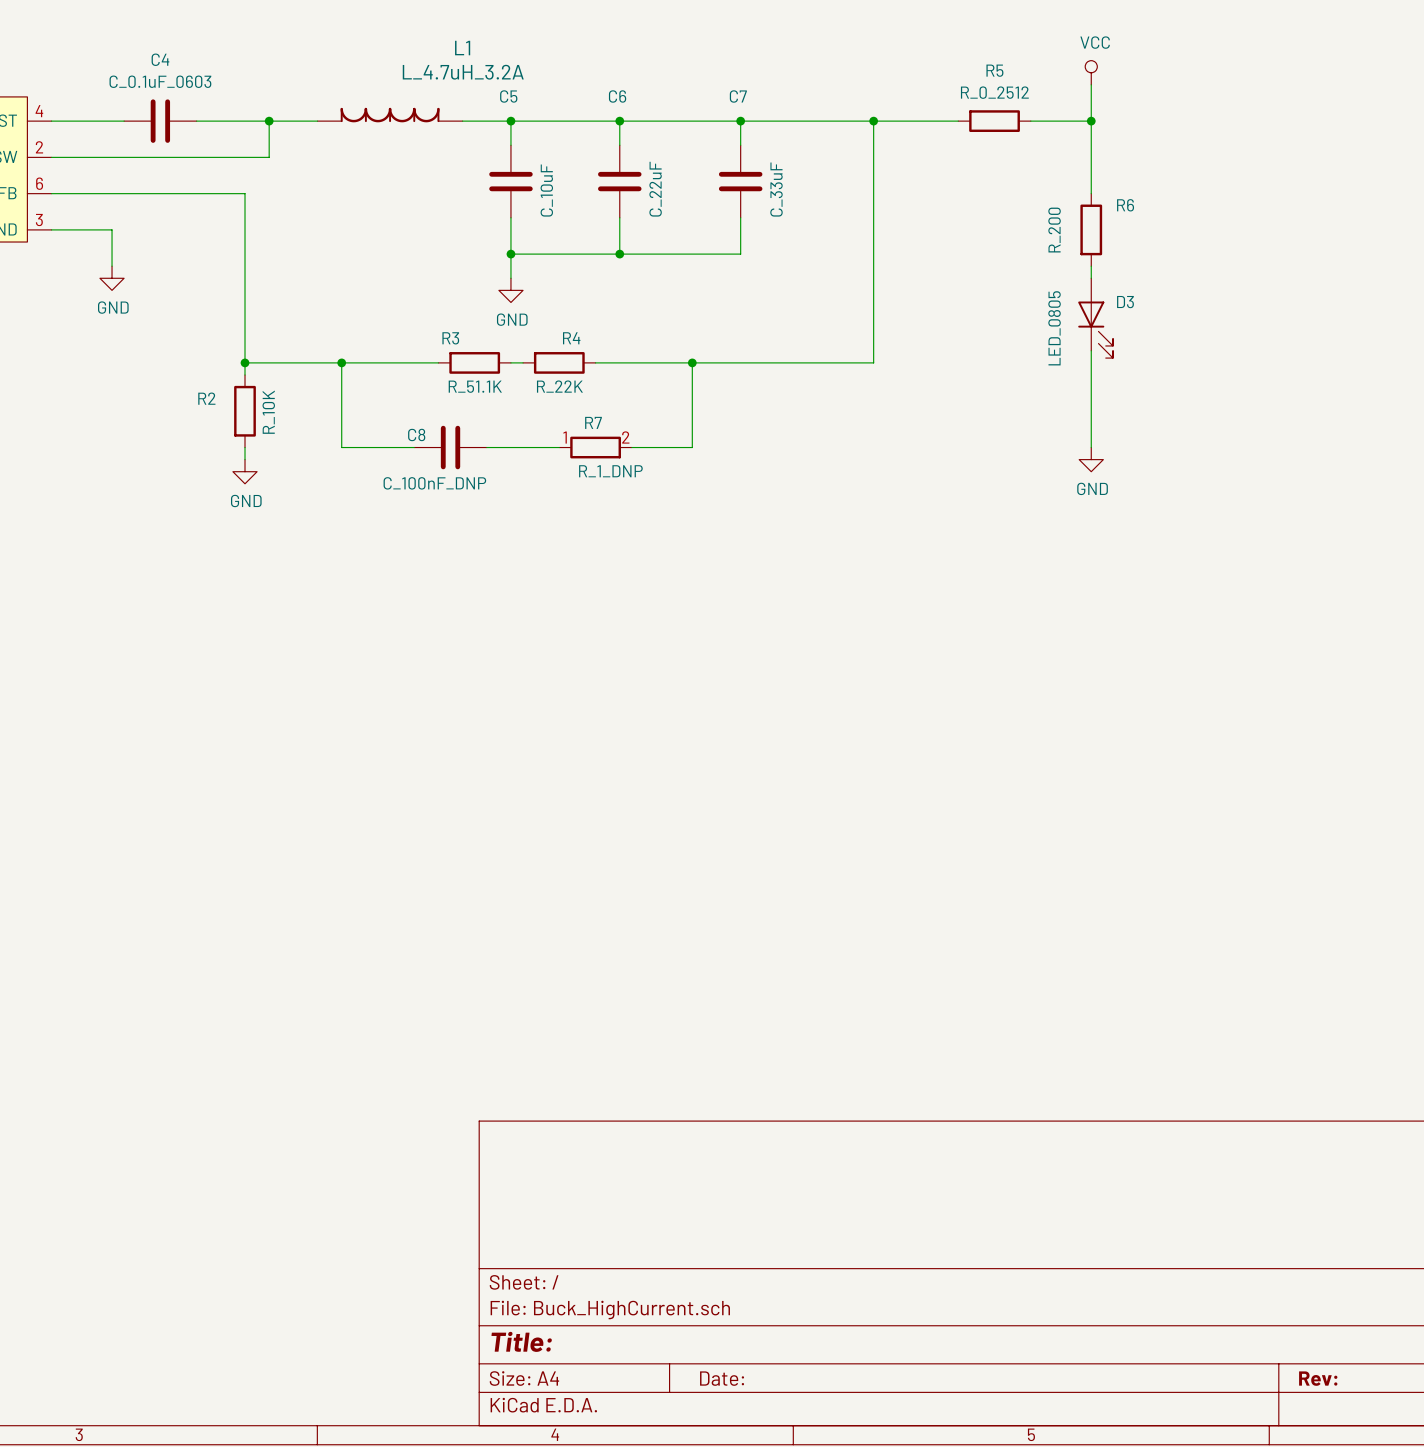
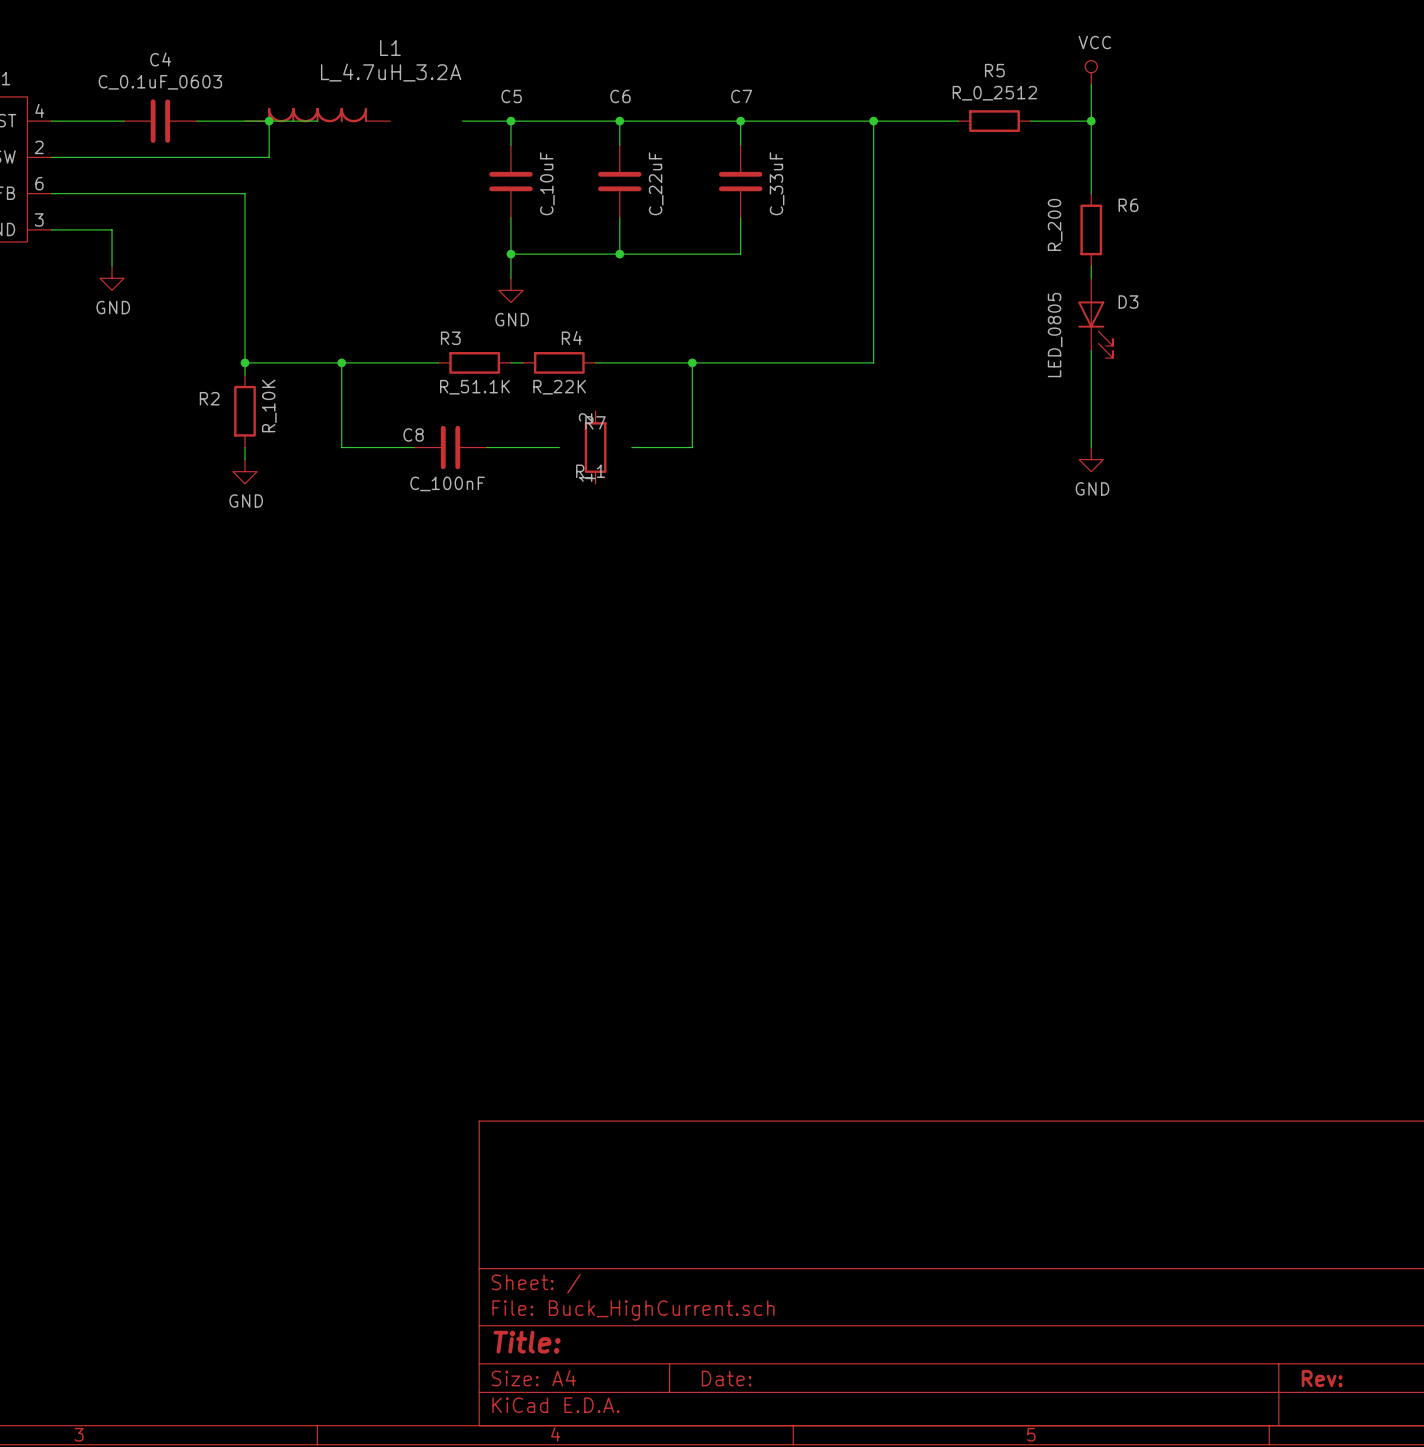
L1 position: (390, 115) -> (317, 115)
R7 rotation: 0° (595, 447) -> 90° counterclockwise (595, 447)
R7 value: R_1_DNP (610, 471) -> R_1 (590, 471)
C8 value: C_100nF_DNP (434, 483) -> C_100nF (447, 483)

